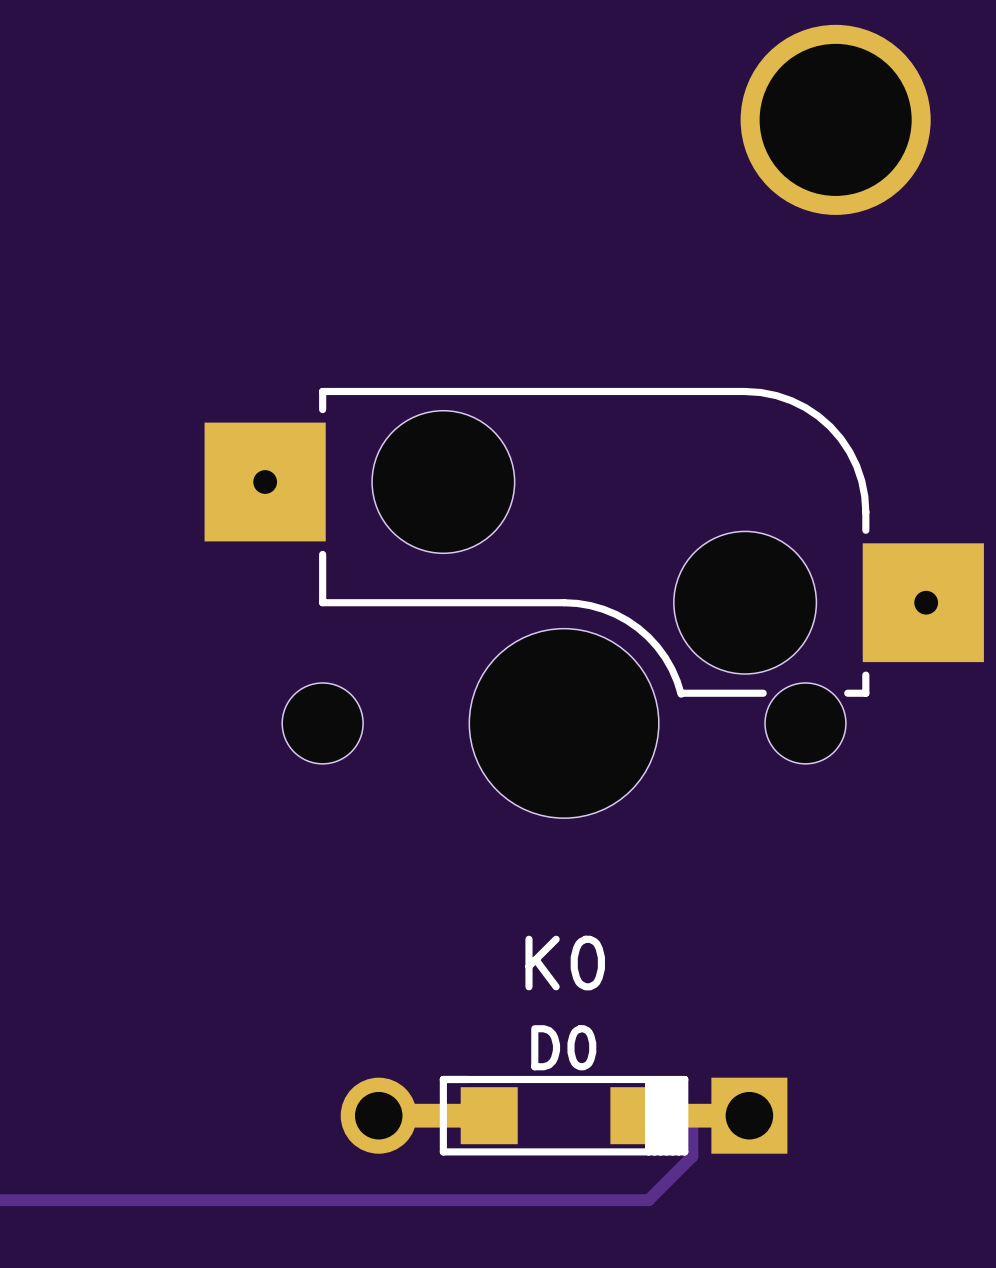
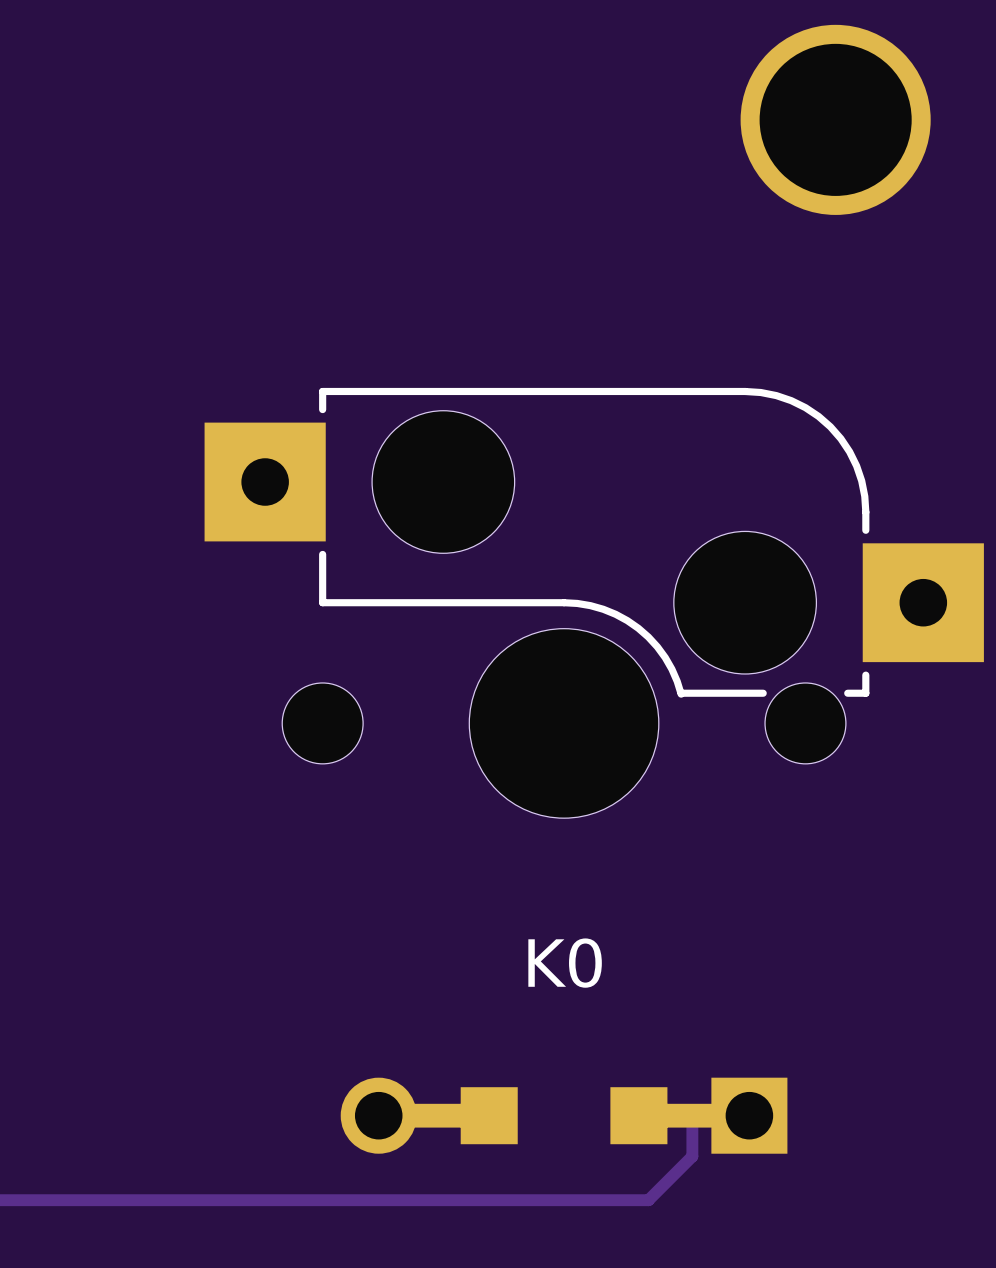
K0 footprint: [204, 387, 984, 819] -> [204, 387, 984, 819]
D0: (564, 1115) -> none
part: none -> (564, 1115)

